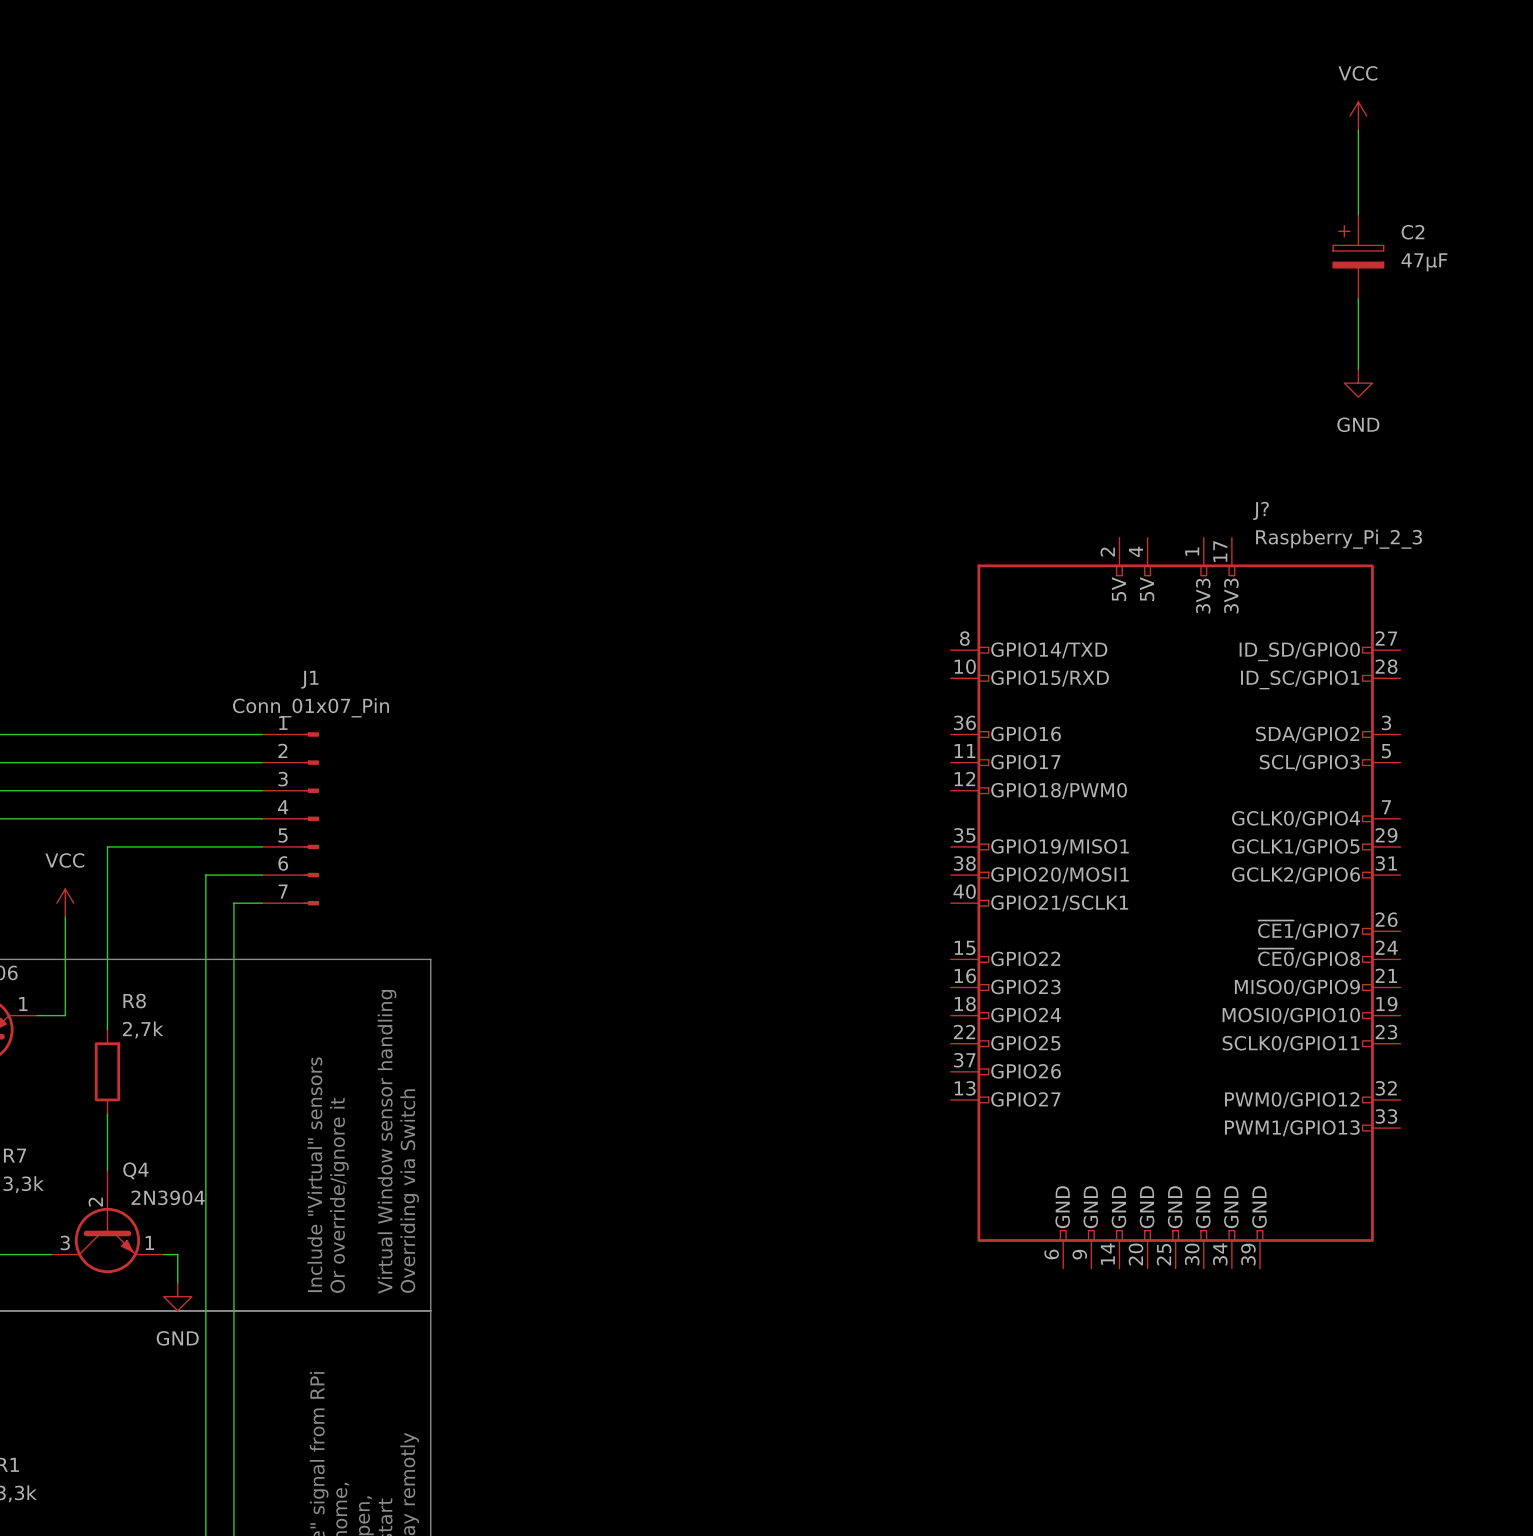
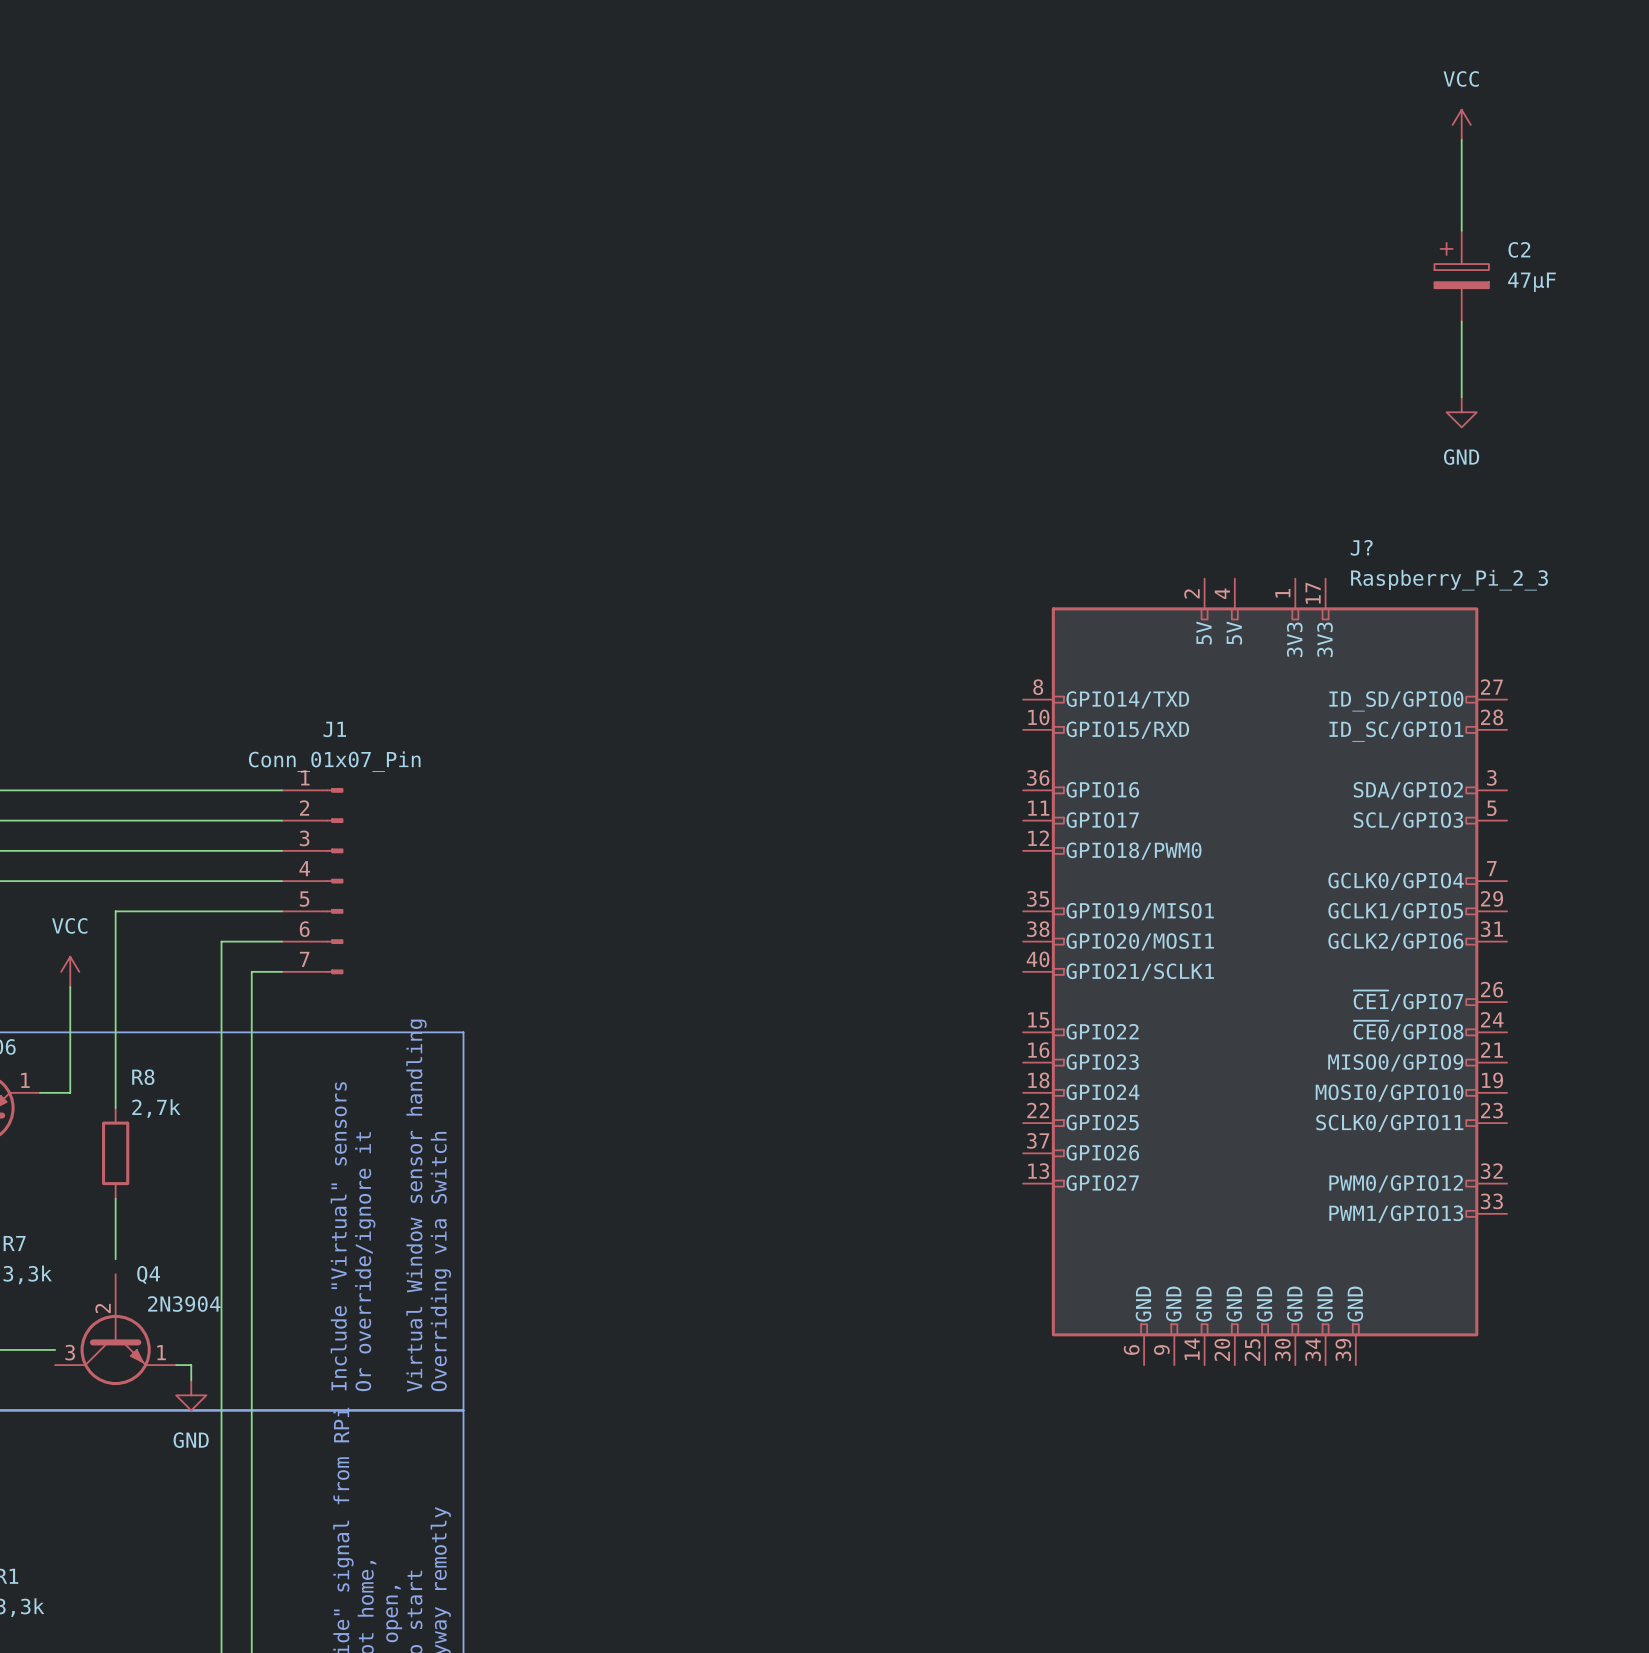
Q4 position: (107, 1221) -> (115, 1329)
wire: (163, 1254) (177, 1254) (177, 1268) -> (176, 1365) (191, 1365)

